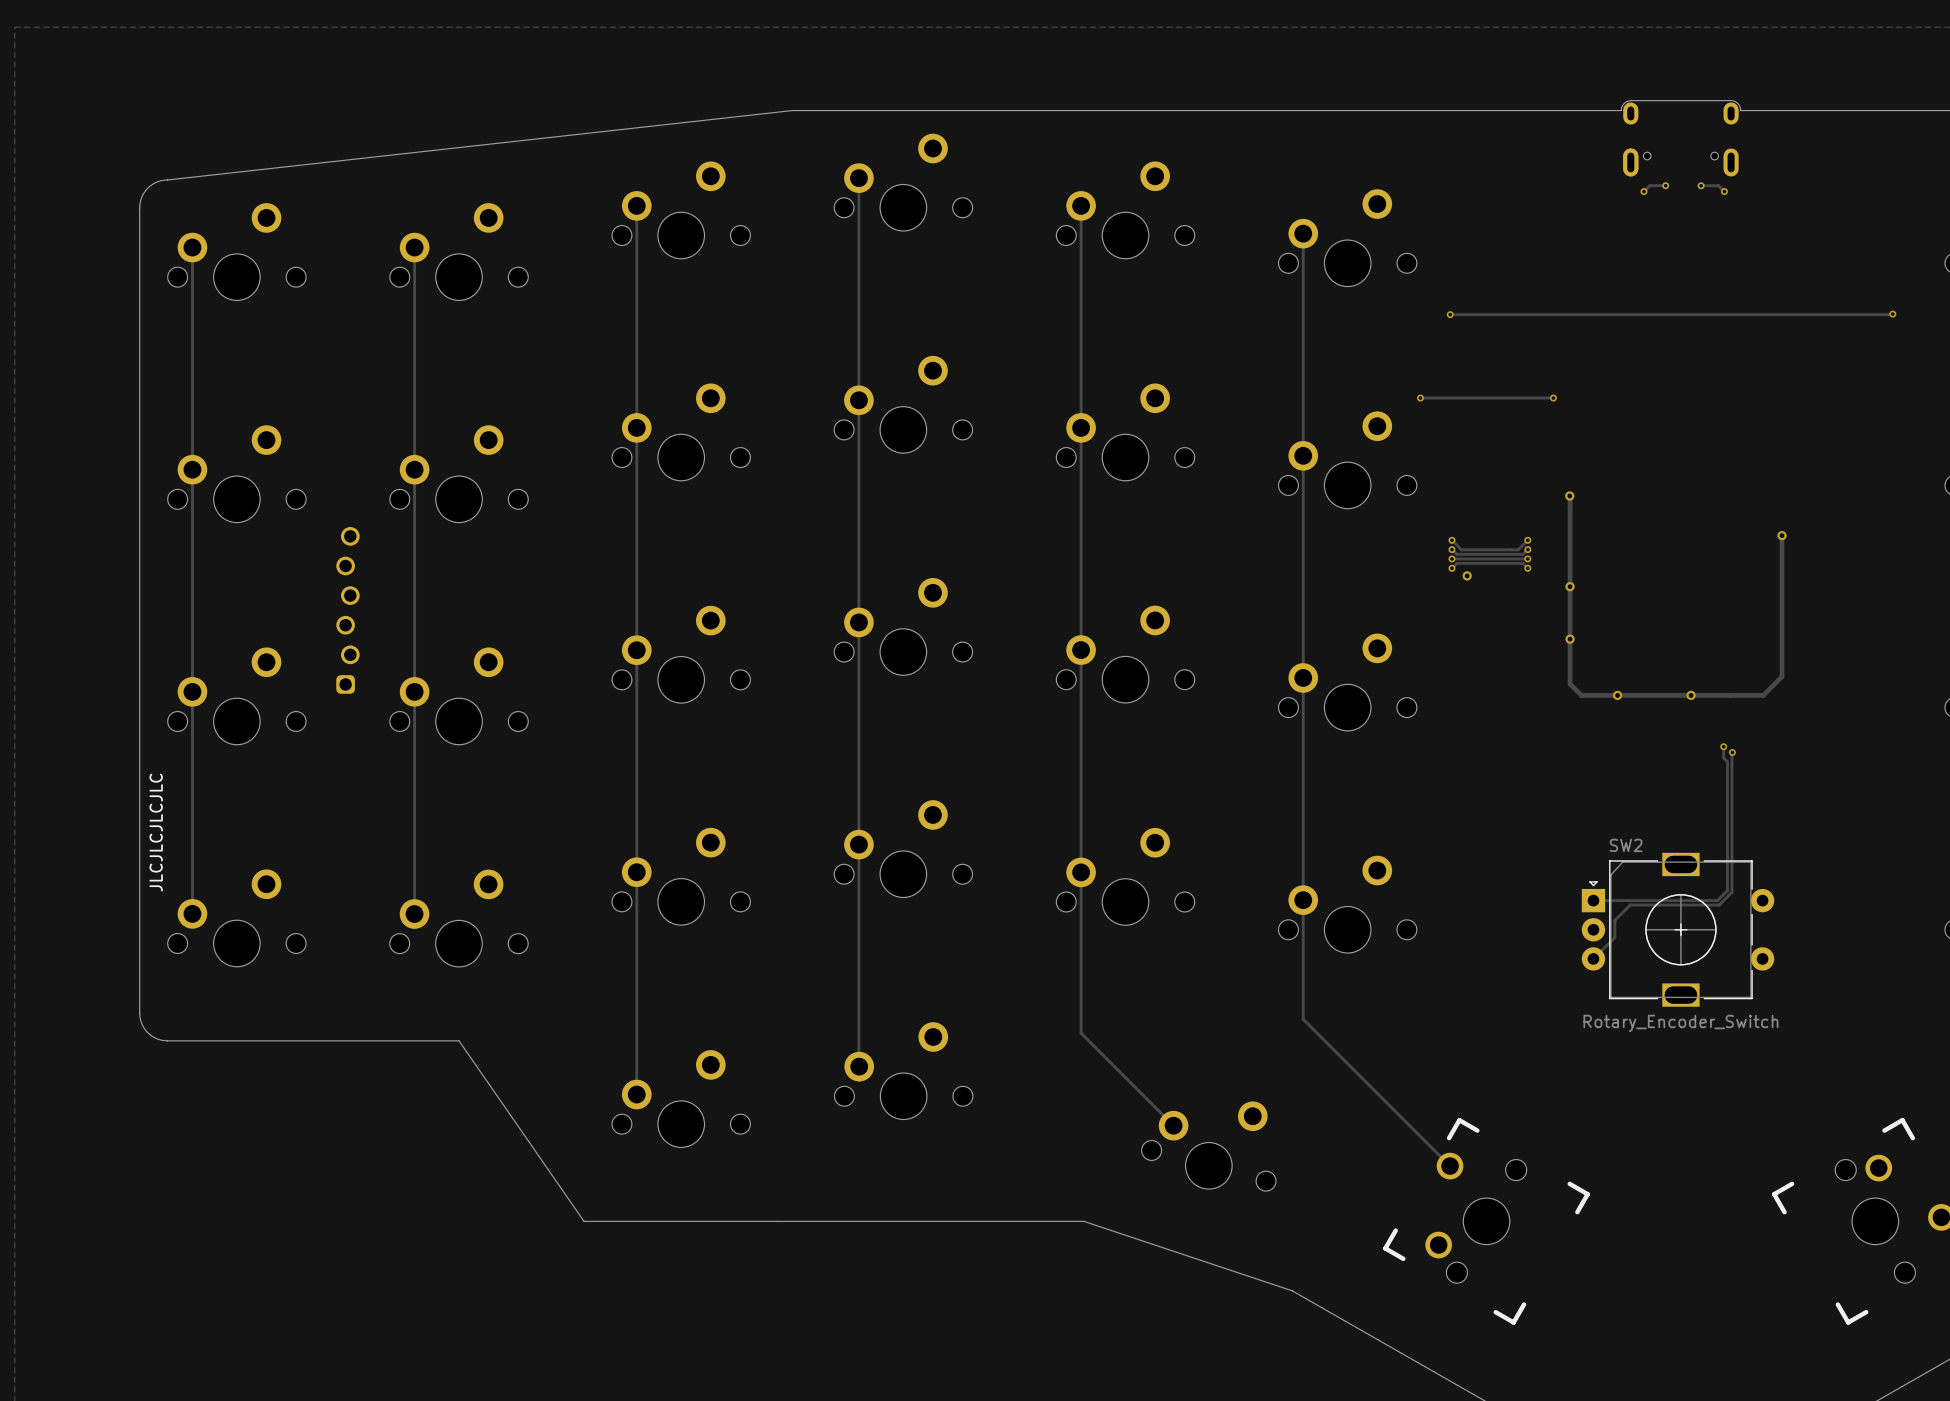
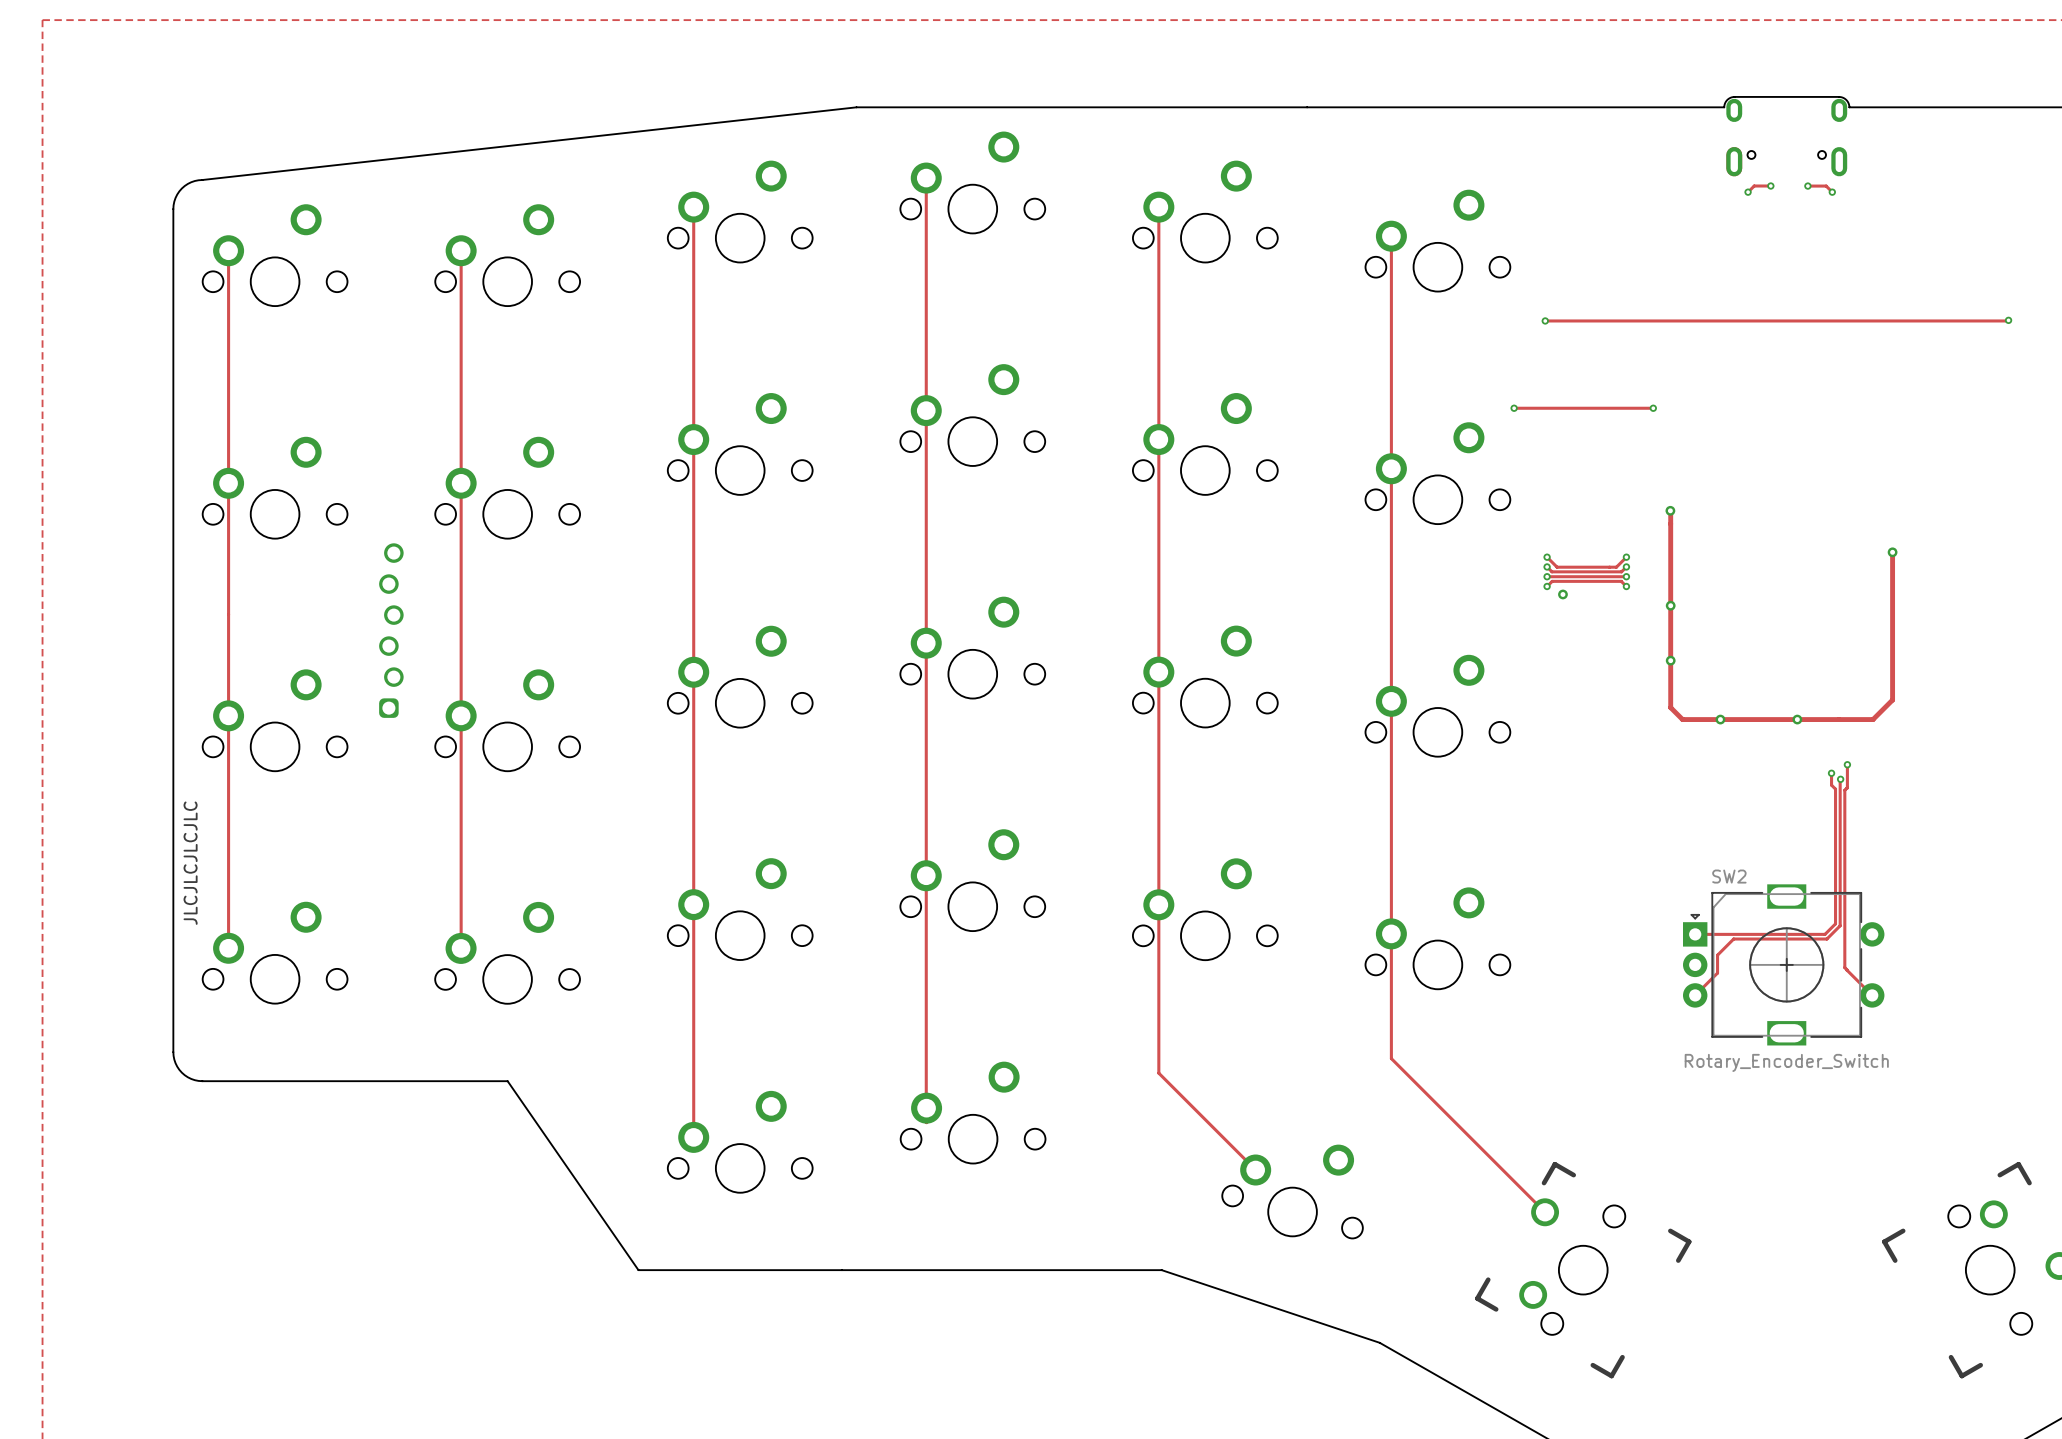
track: none -> (1847, 764) (1847, 787) (1844, 790) (1844, 967) (1872, 995)
via: none -> (1847, 764)

